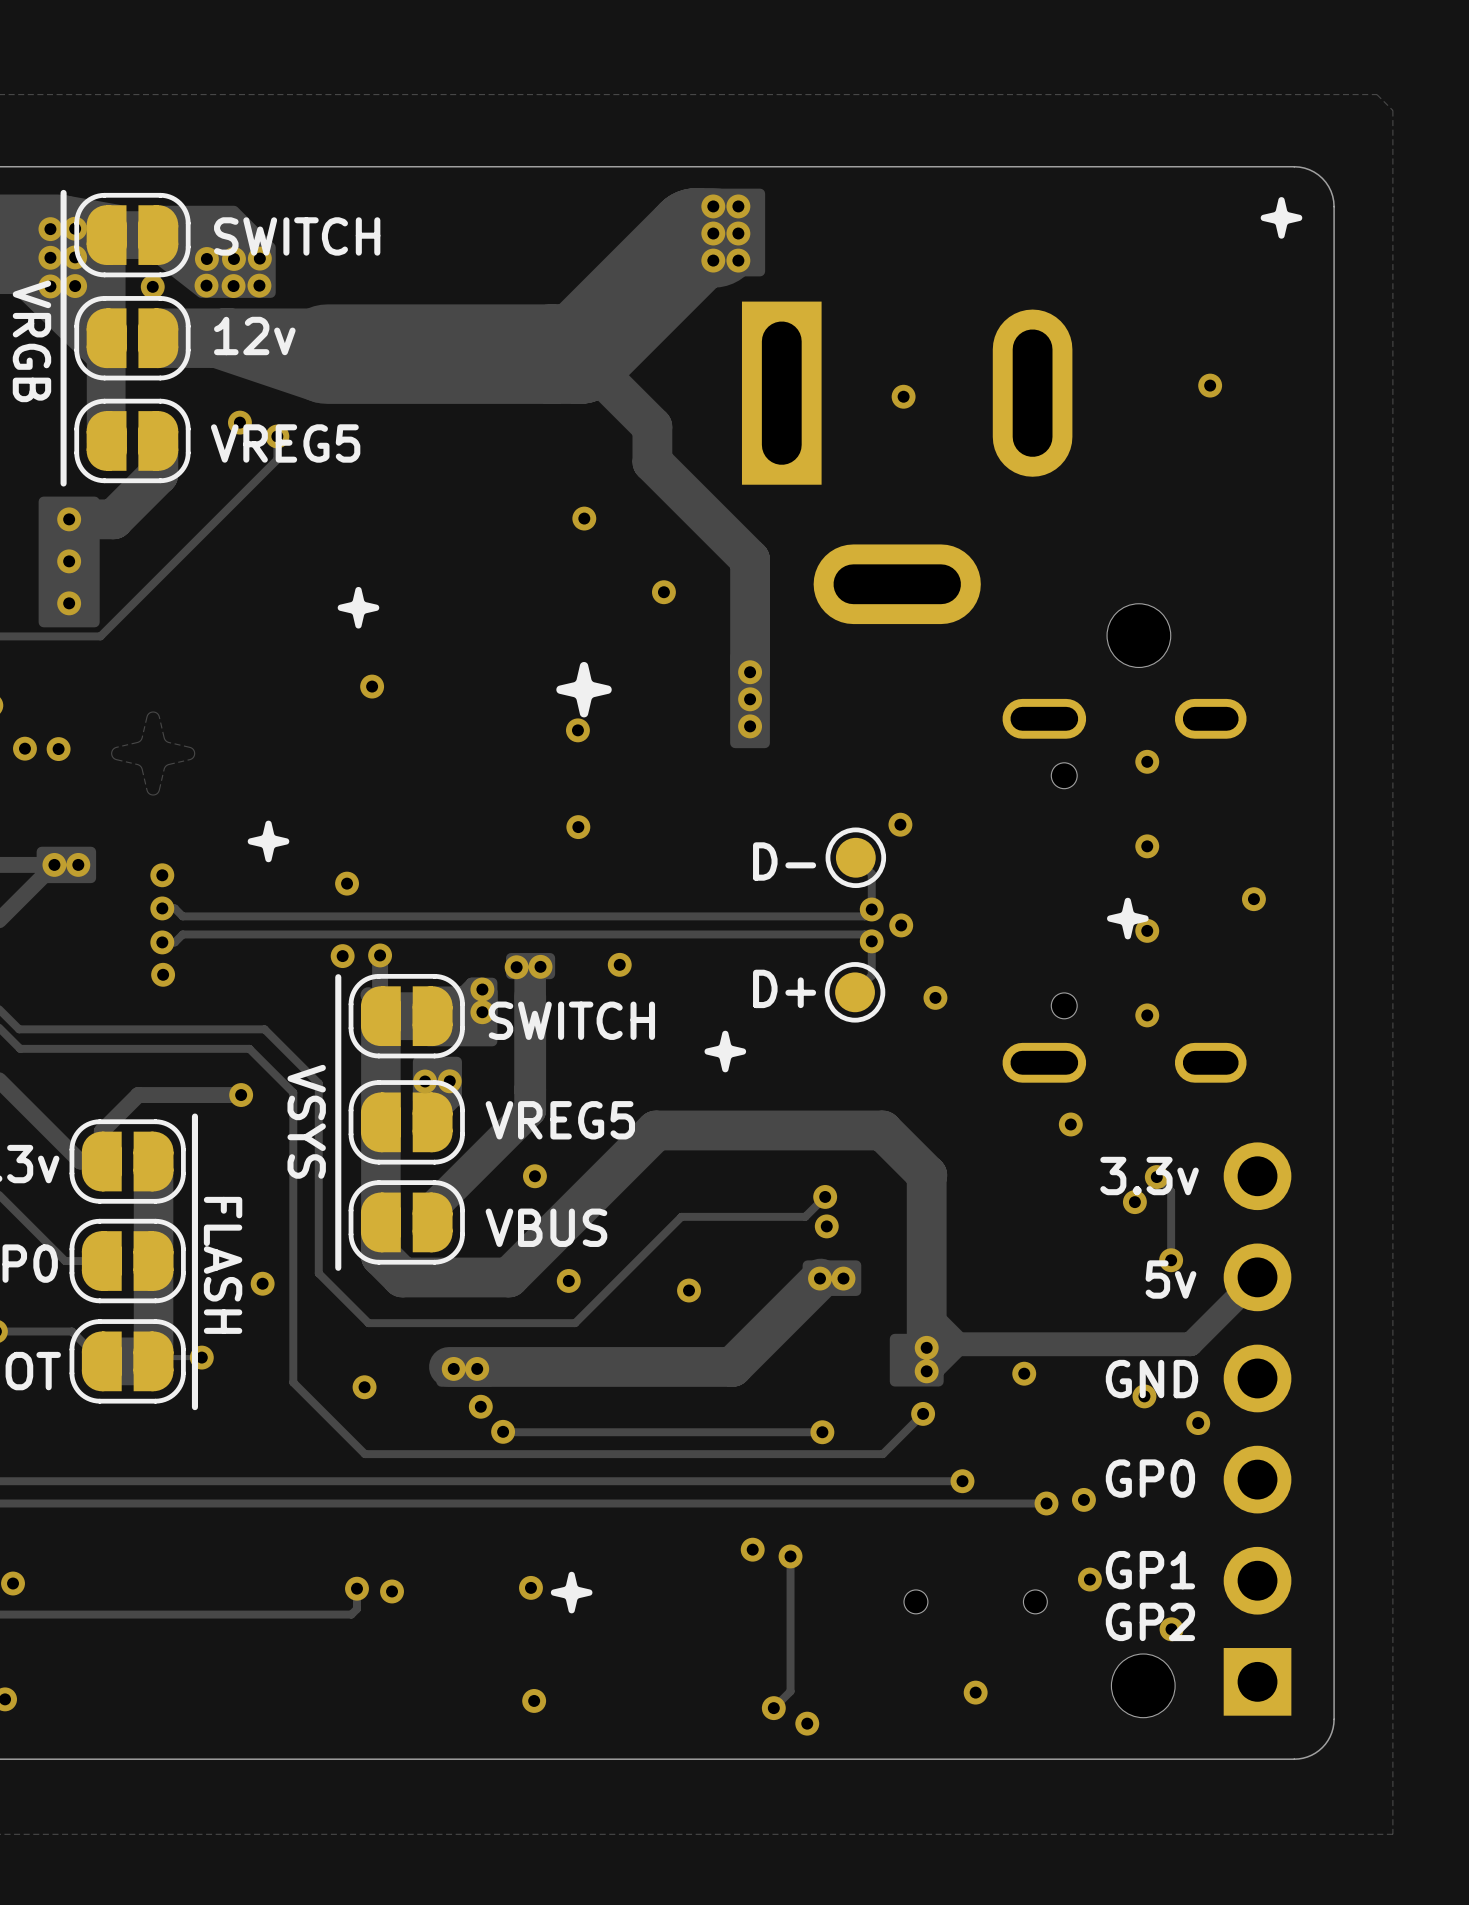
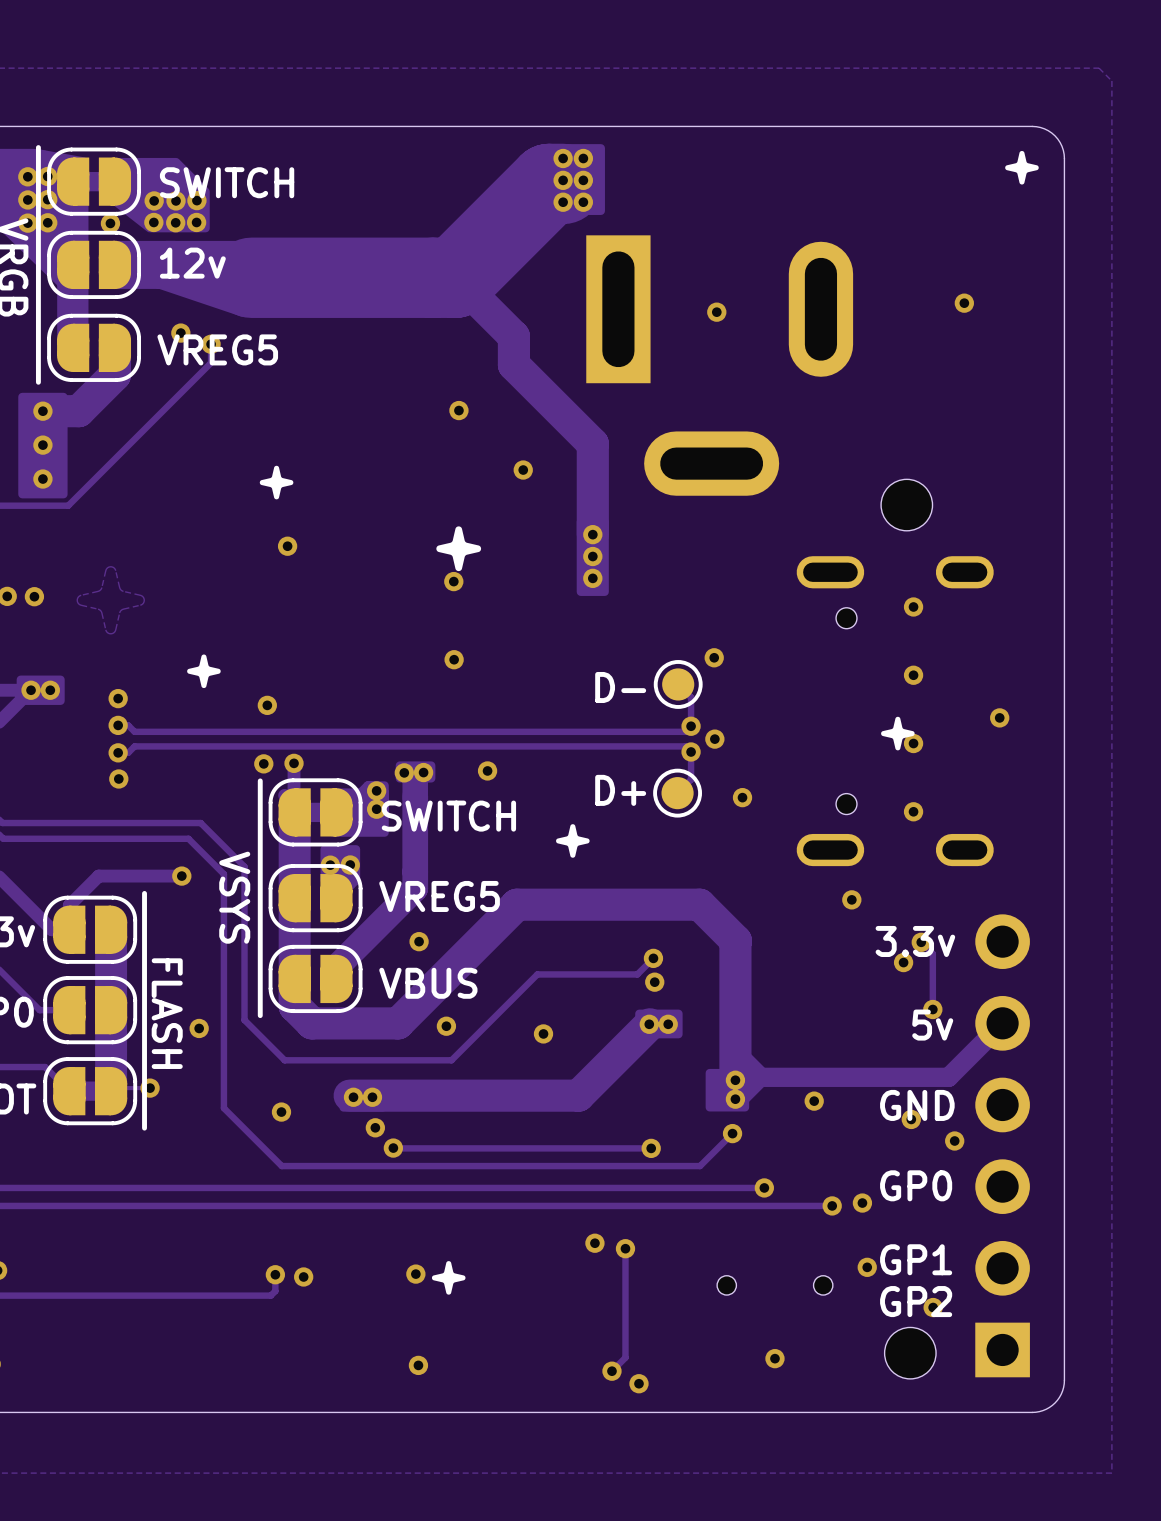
part footprint: [74, 192, 191, 278] -> [47, 147, 141, 216]
part footprint: [348, 973, 465, 1059] -> [268, 778, 363, 847]
part footprint: [69, 1319, 186, 1404] -> [43, 1057, 138, 1126]

